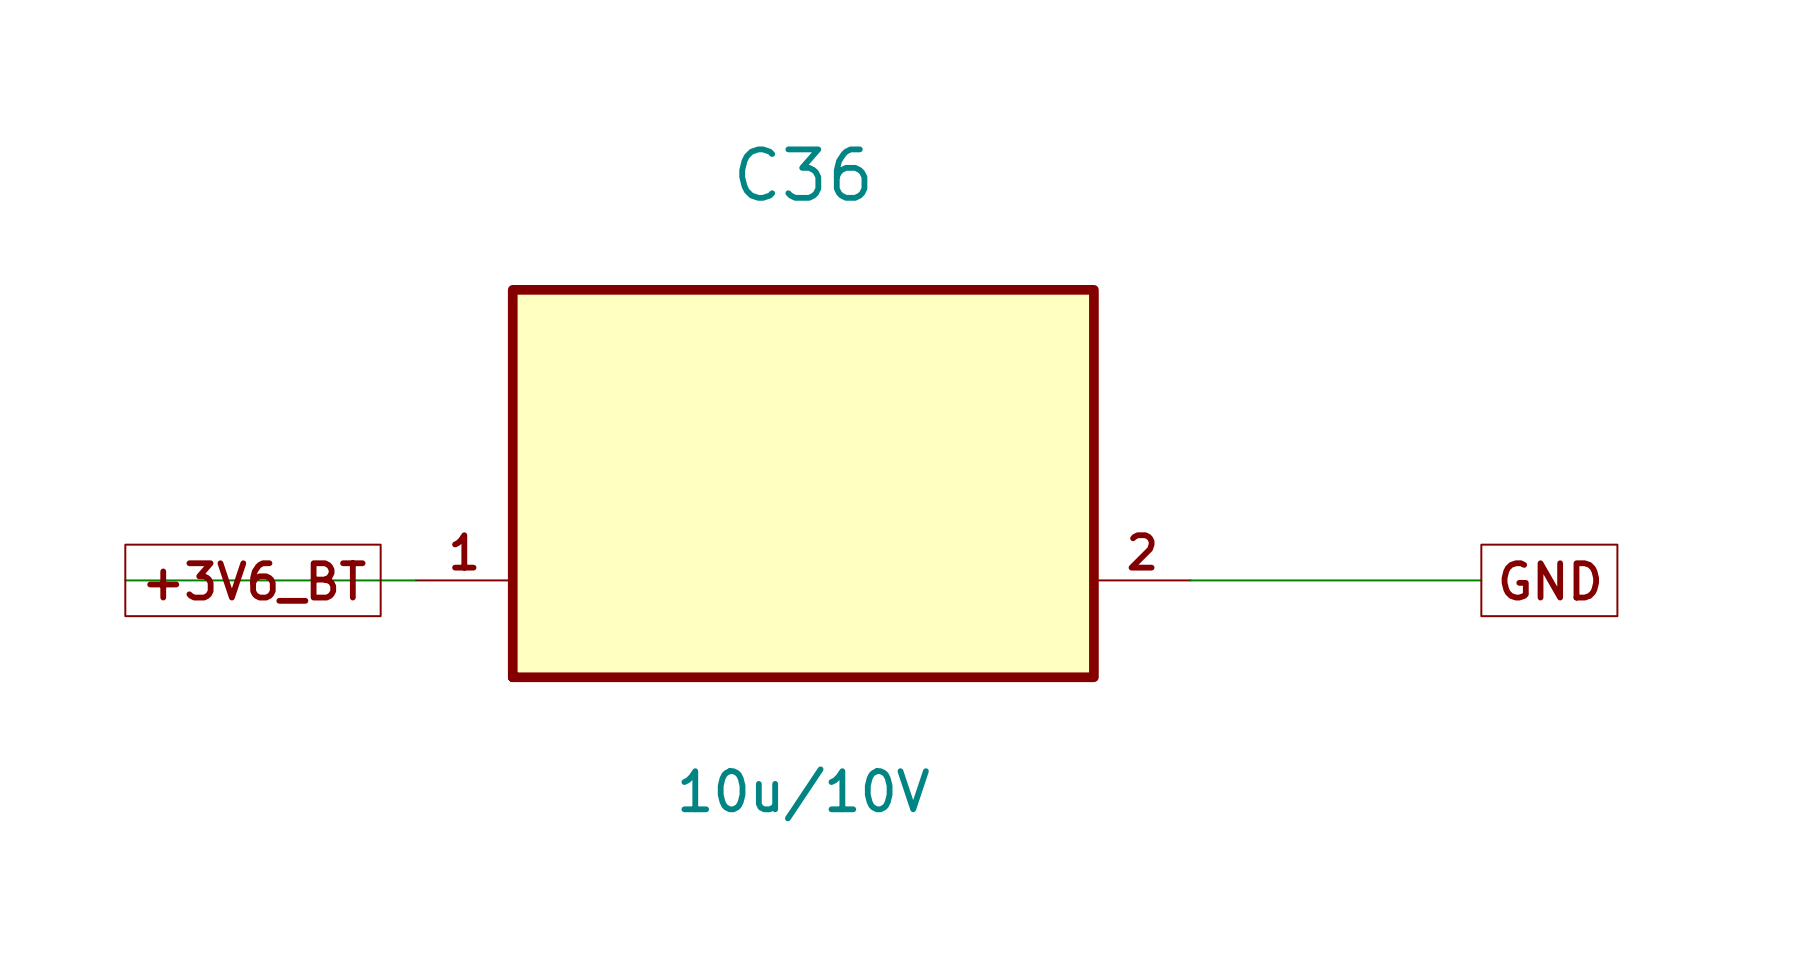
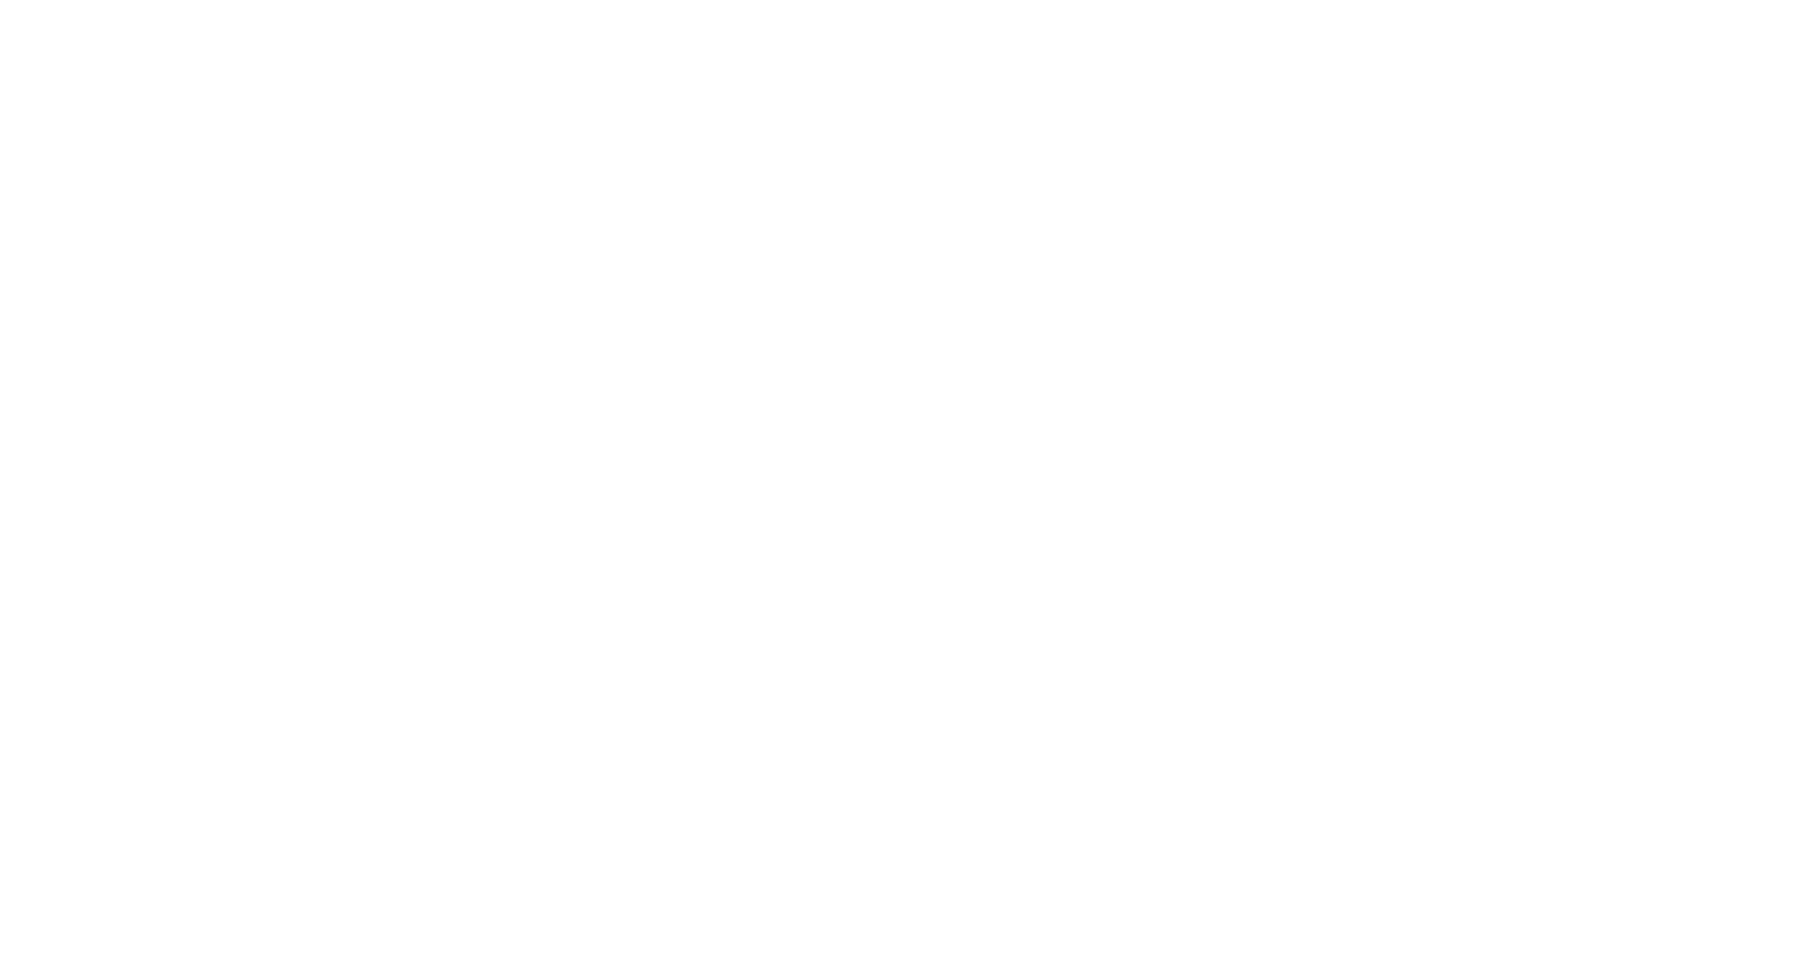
C36: 10u/10V (803, 483) -> none
wire: (125, 580) (415, 580) -> none
wire: (1190, 580) (1481, 580) -> none
global label: GND (1550, 580) -> none
global label: +3V6_BT (256, 582) -> none

